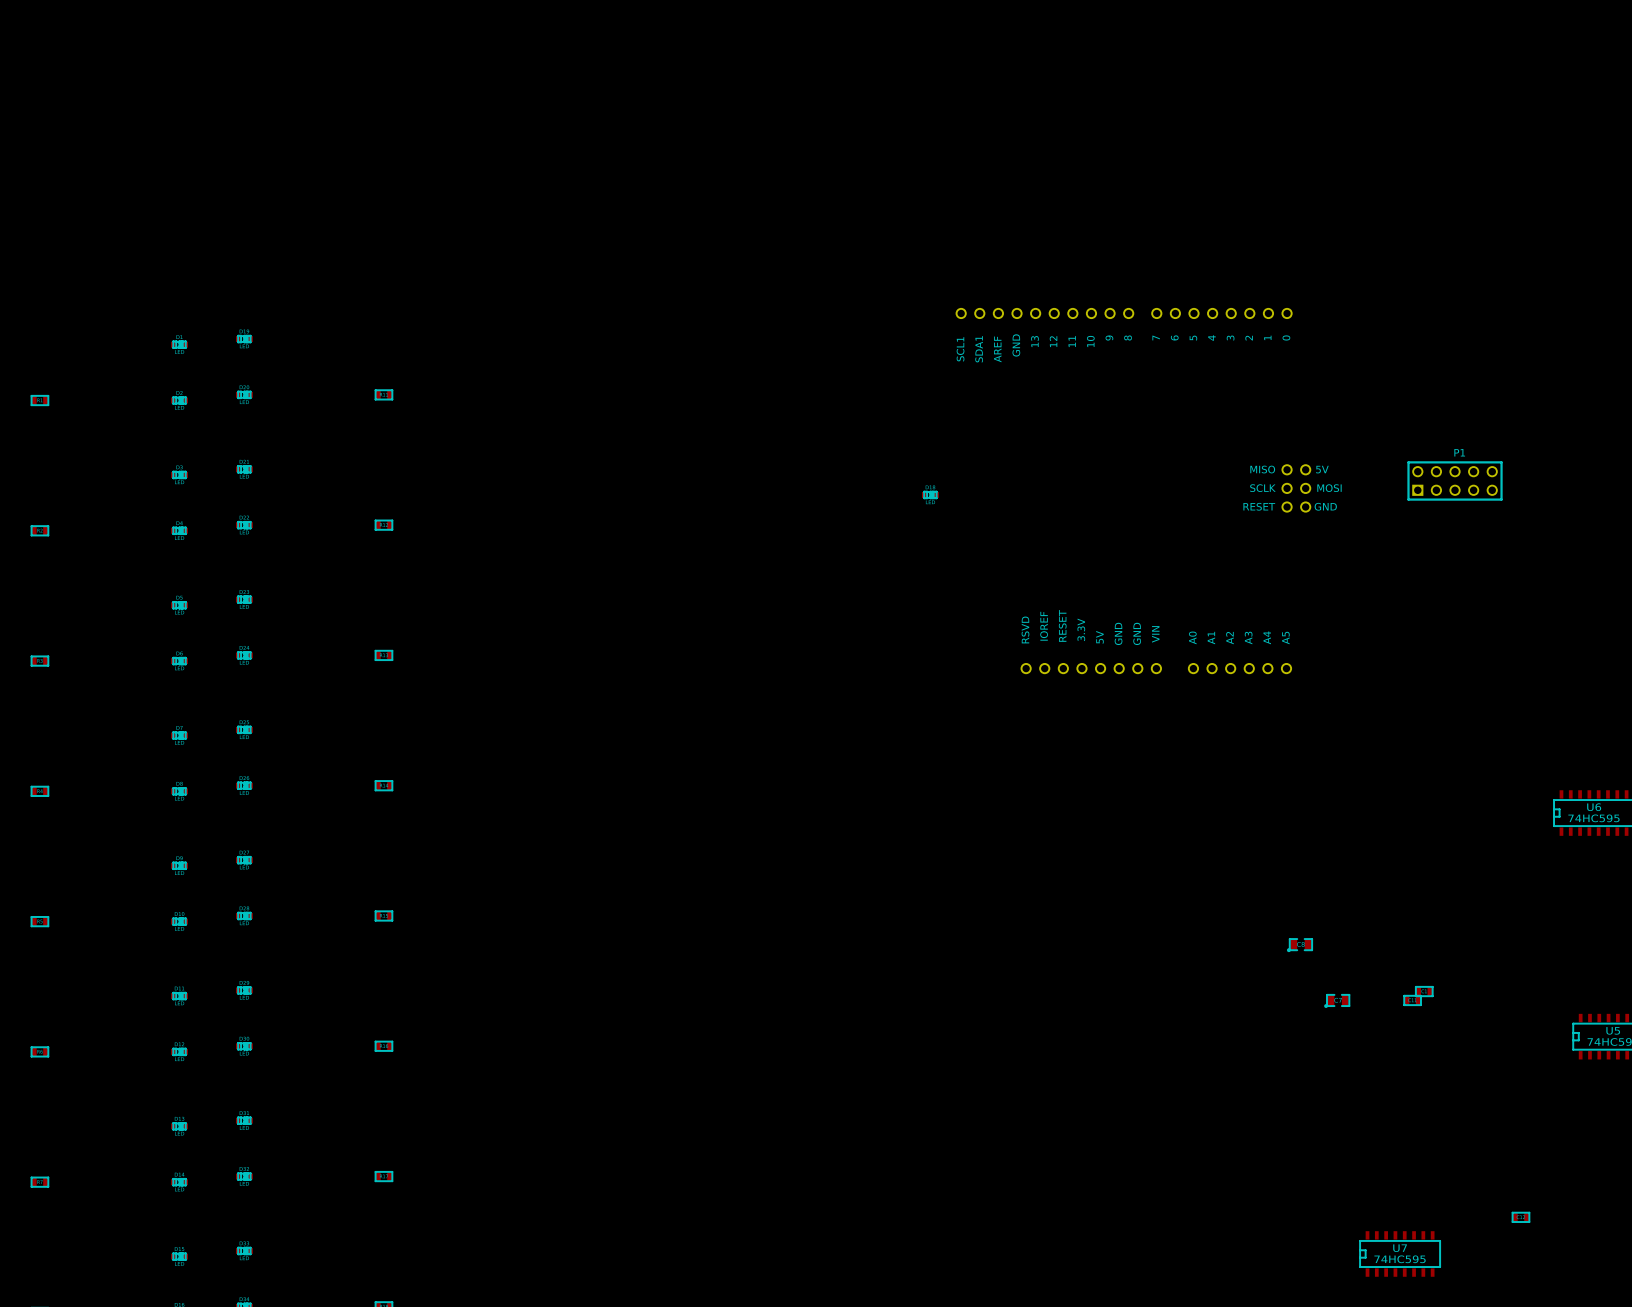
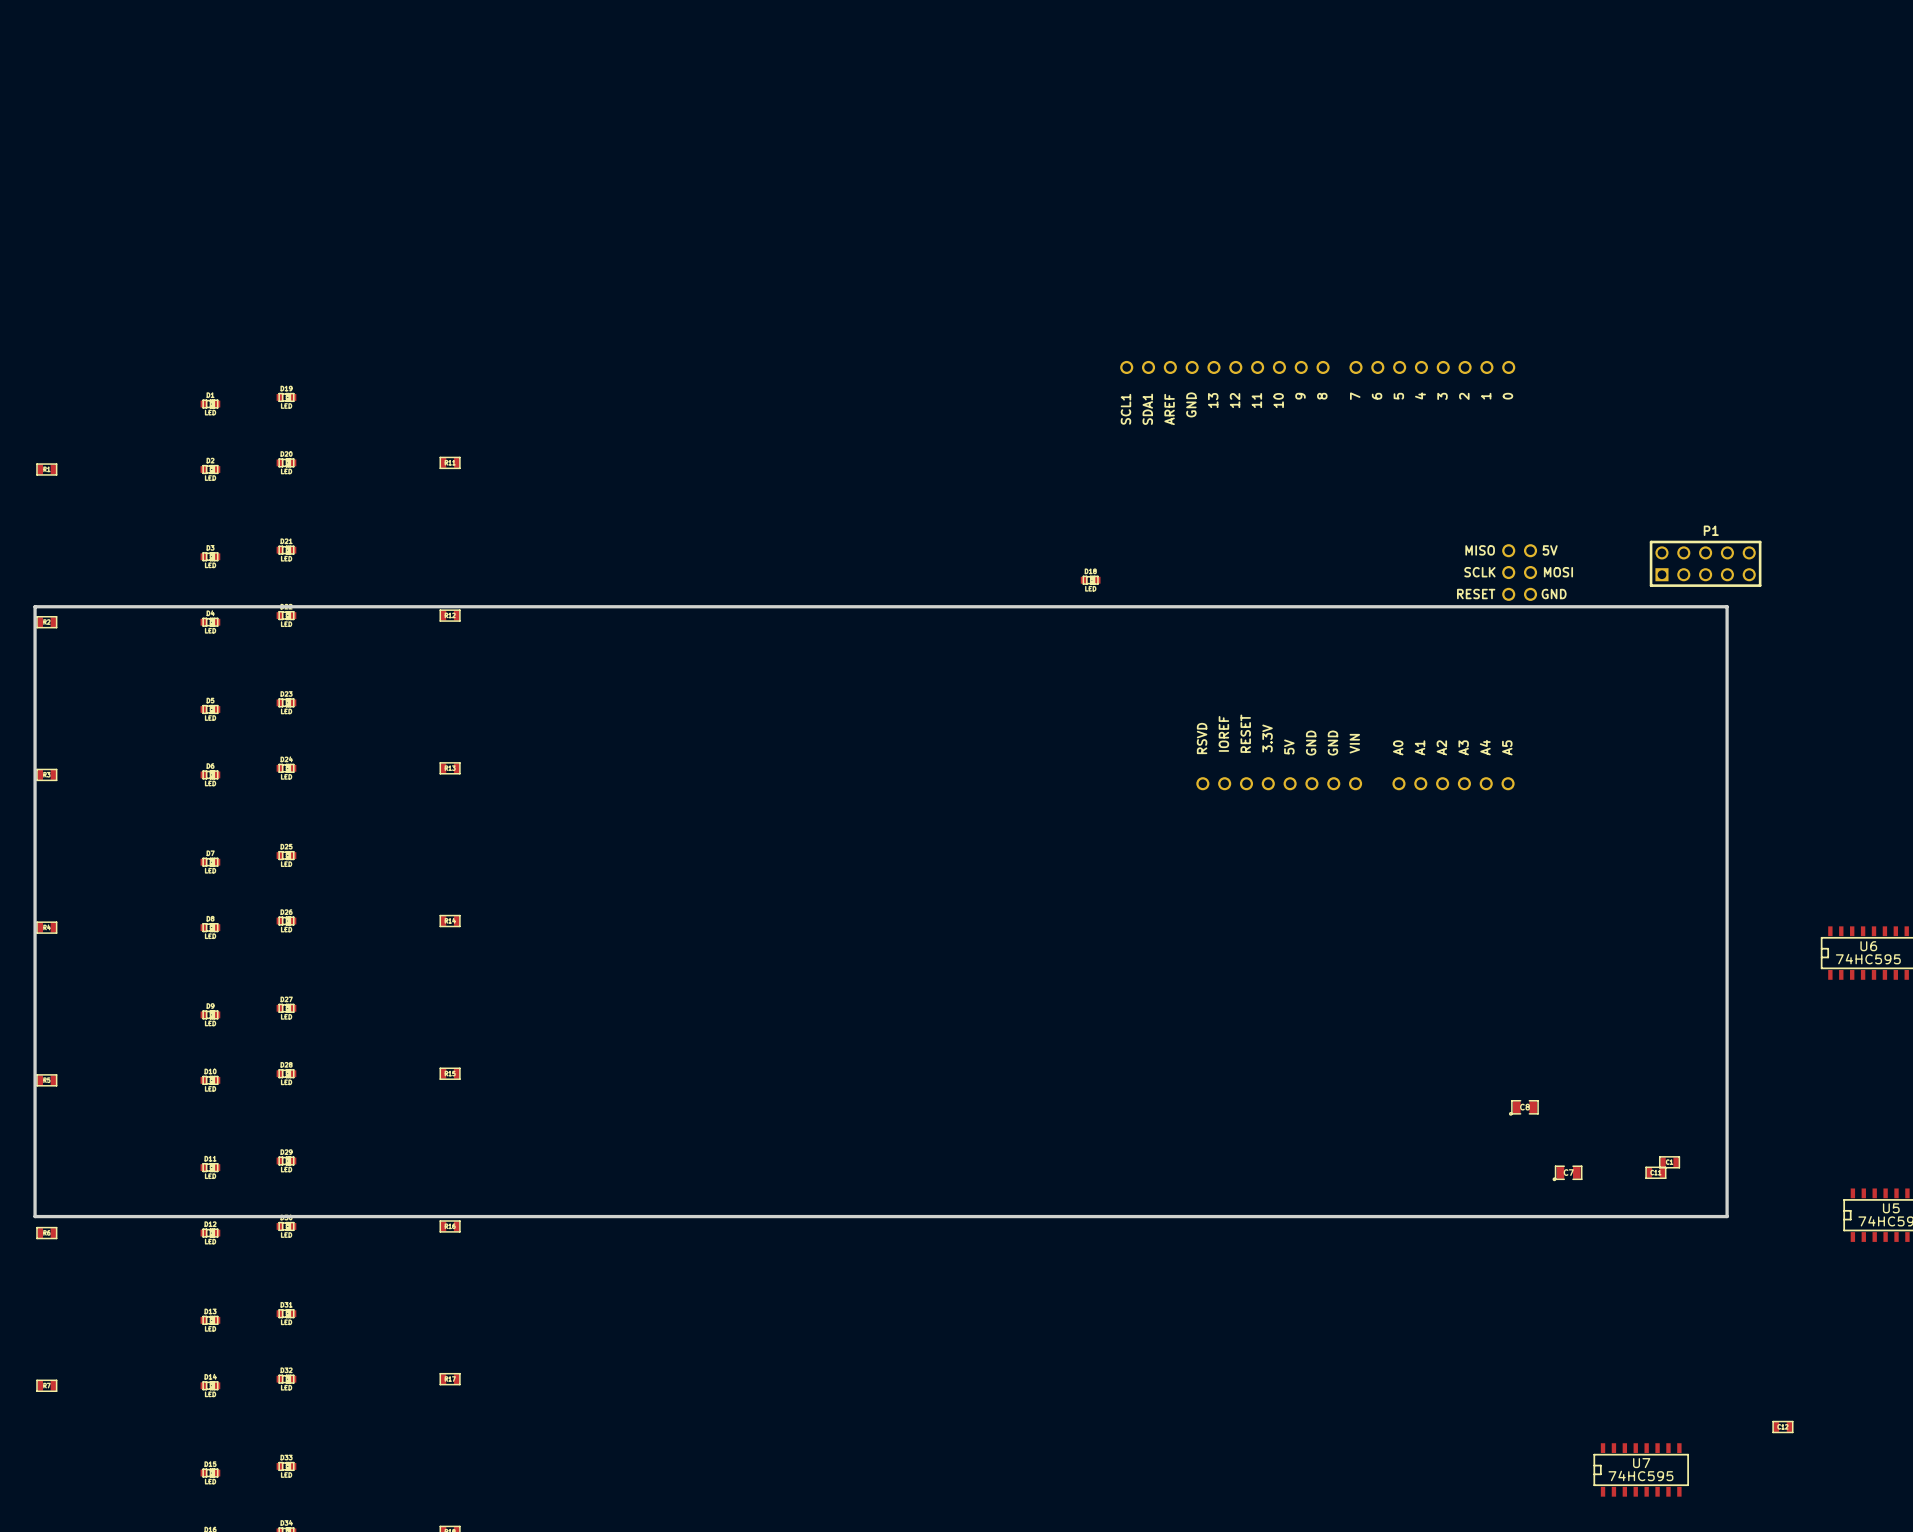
board edge: none -> (35, 606) (35, 1216) (1727, 1216) (1727, 606) (35, 606)

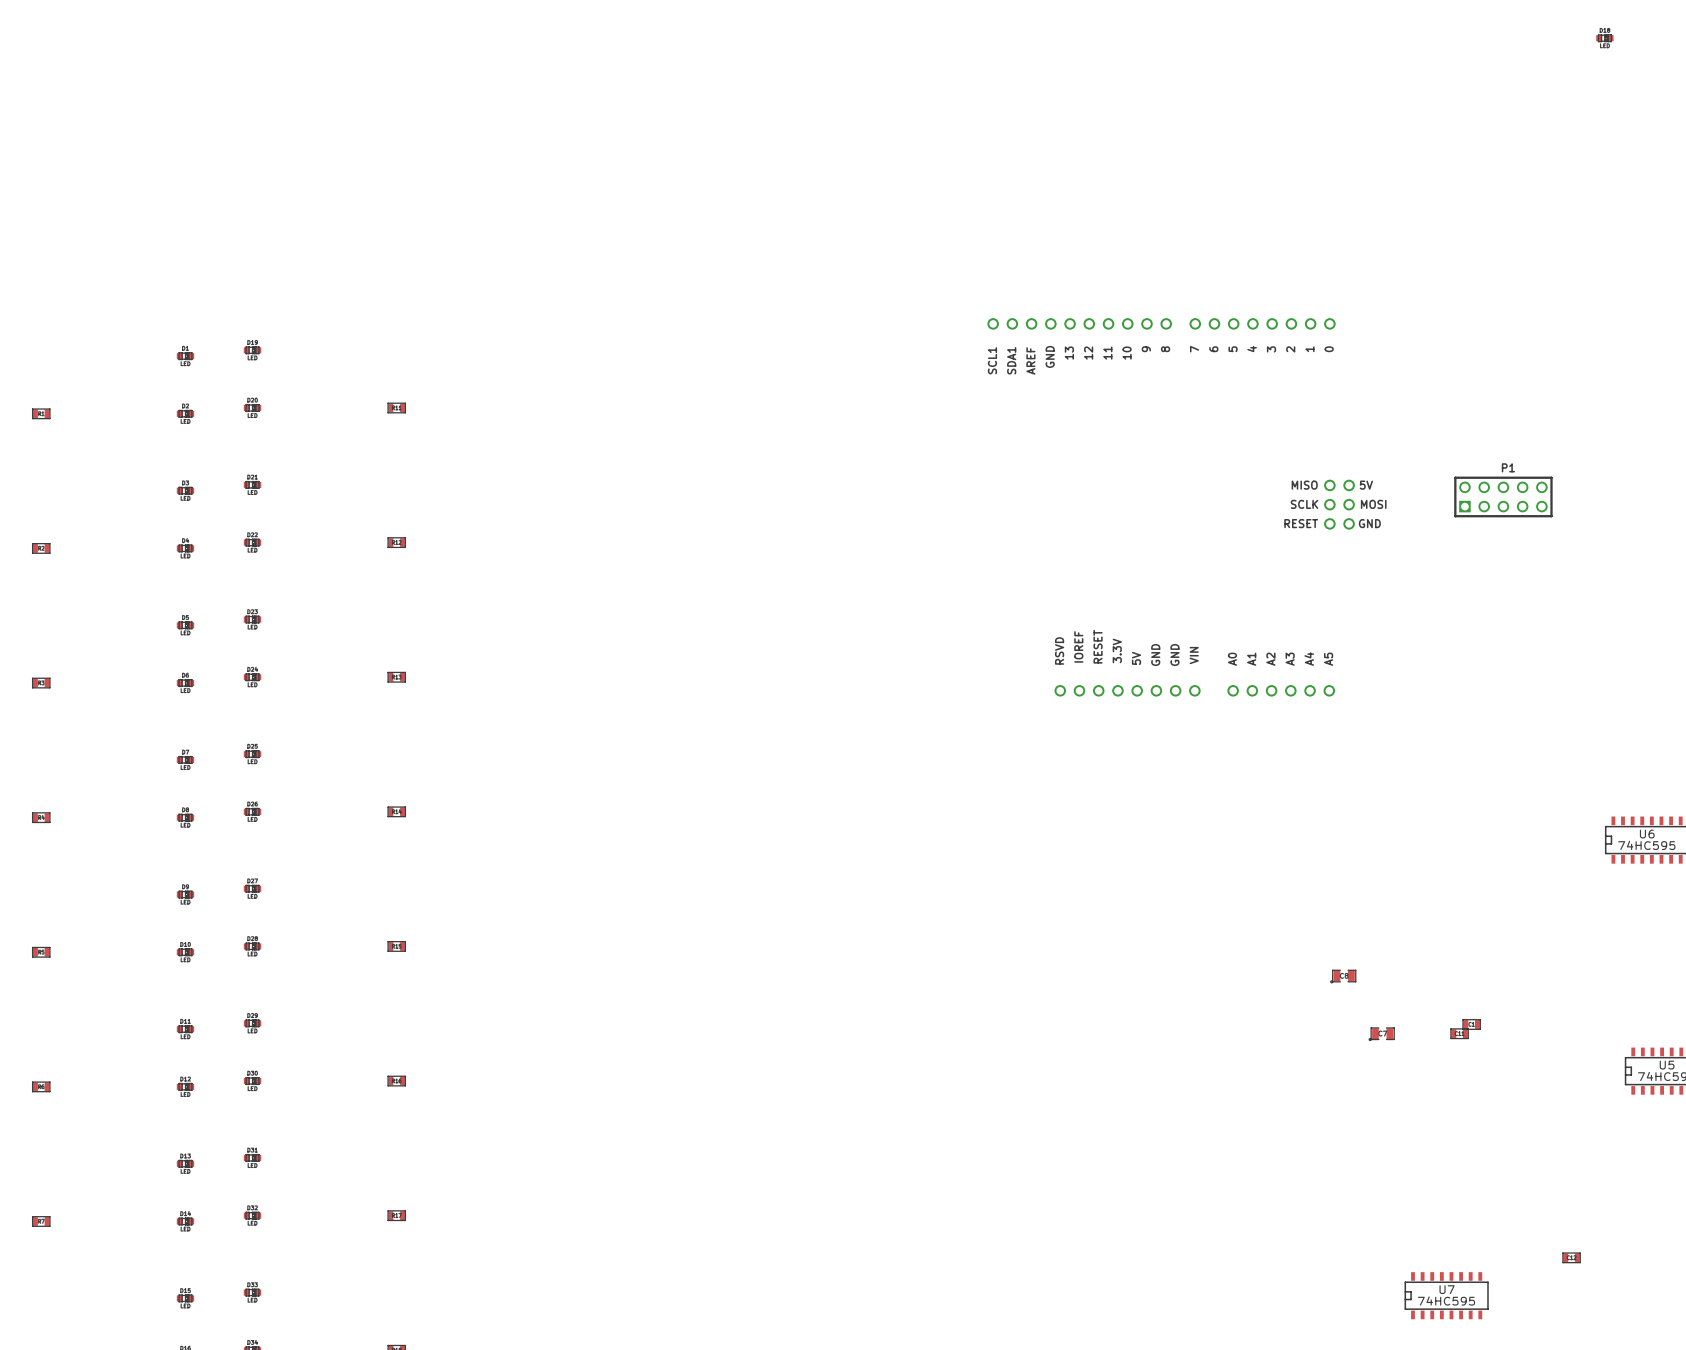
part position: (1090, 580) -> (1604, 38)
board edge: (35, 606) (35, 1216) (1727, 1216) (1727, 606) (35, 606) -> none

